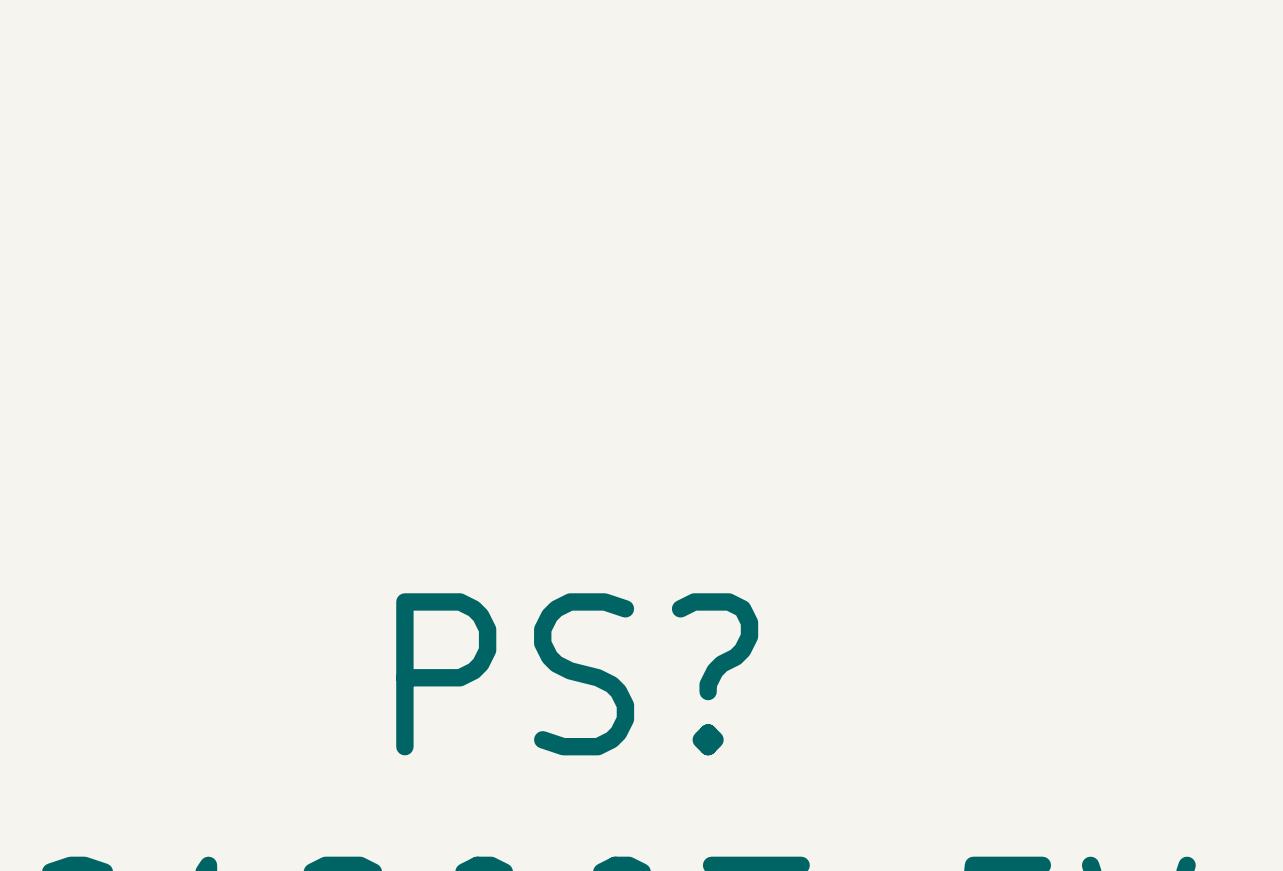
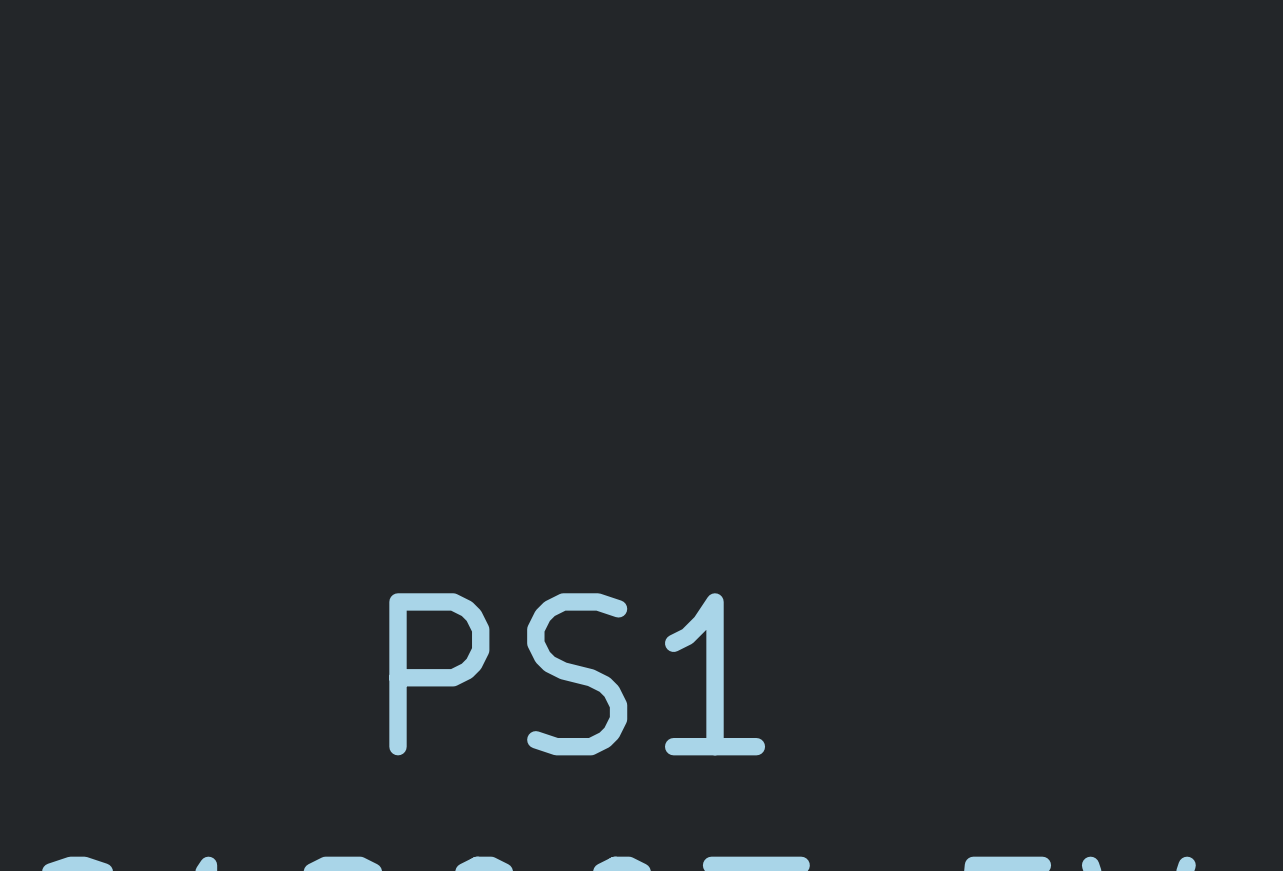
PS? name: PS? (577, 674) -> PS1 (577, 674)

